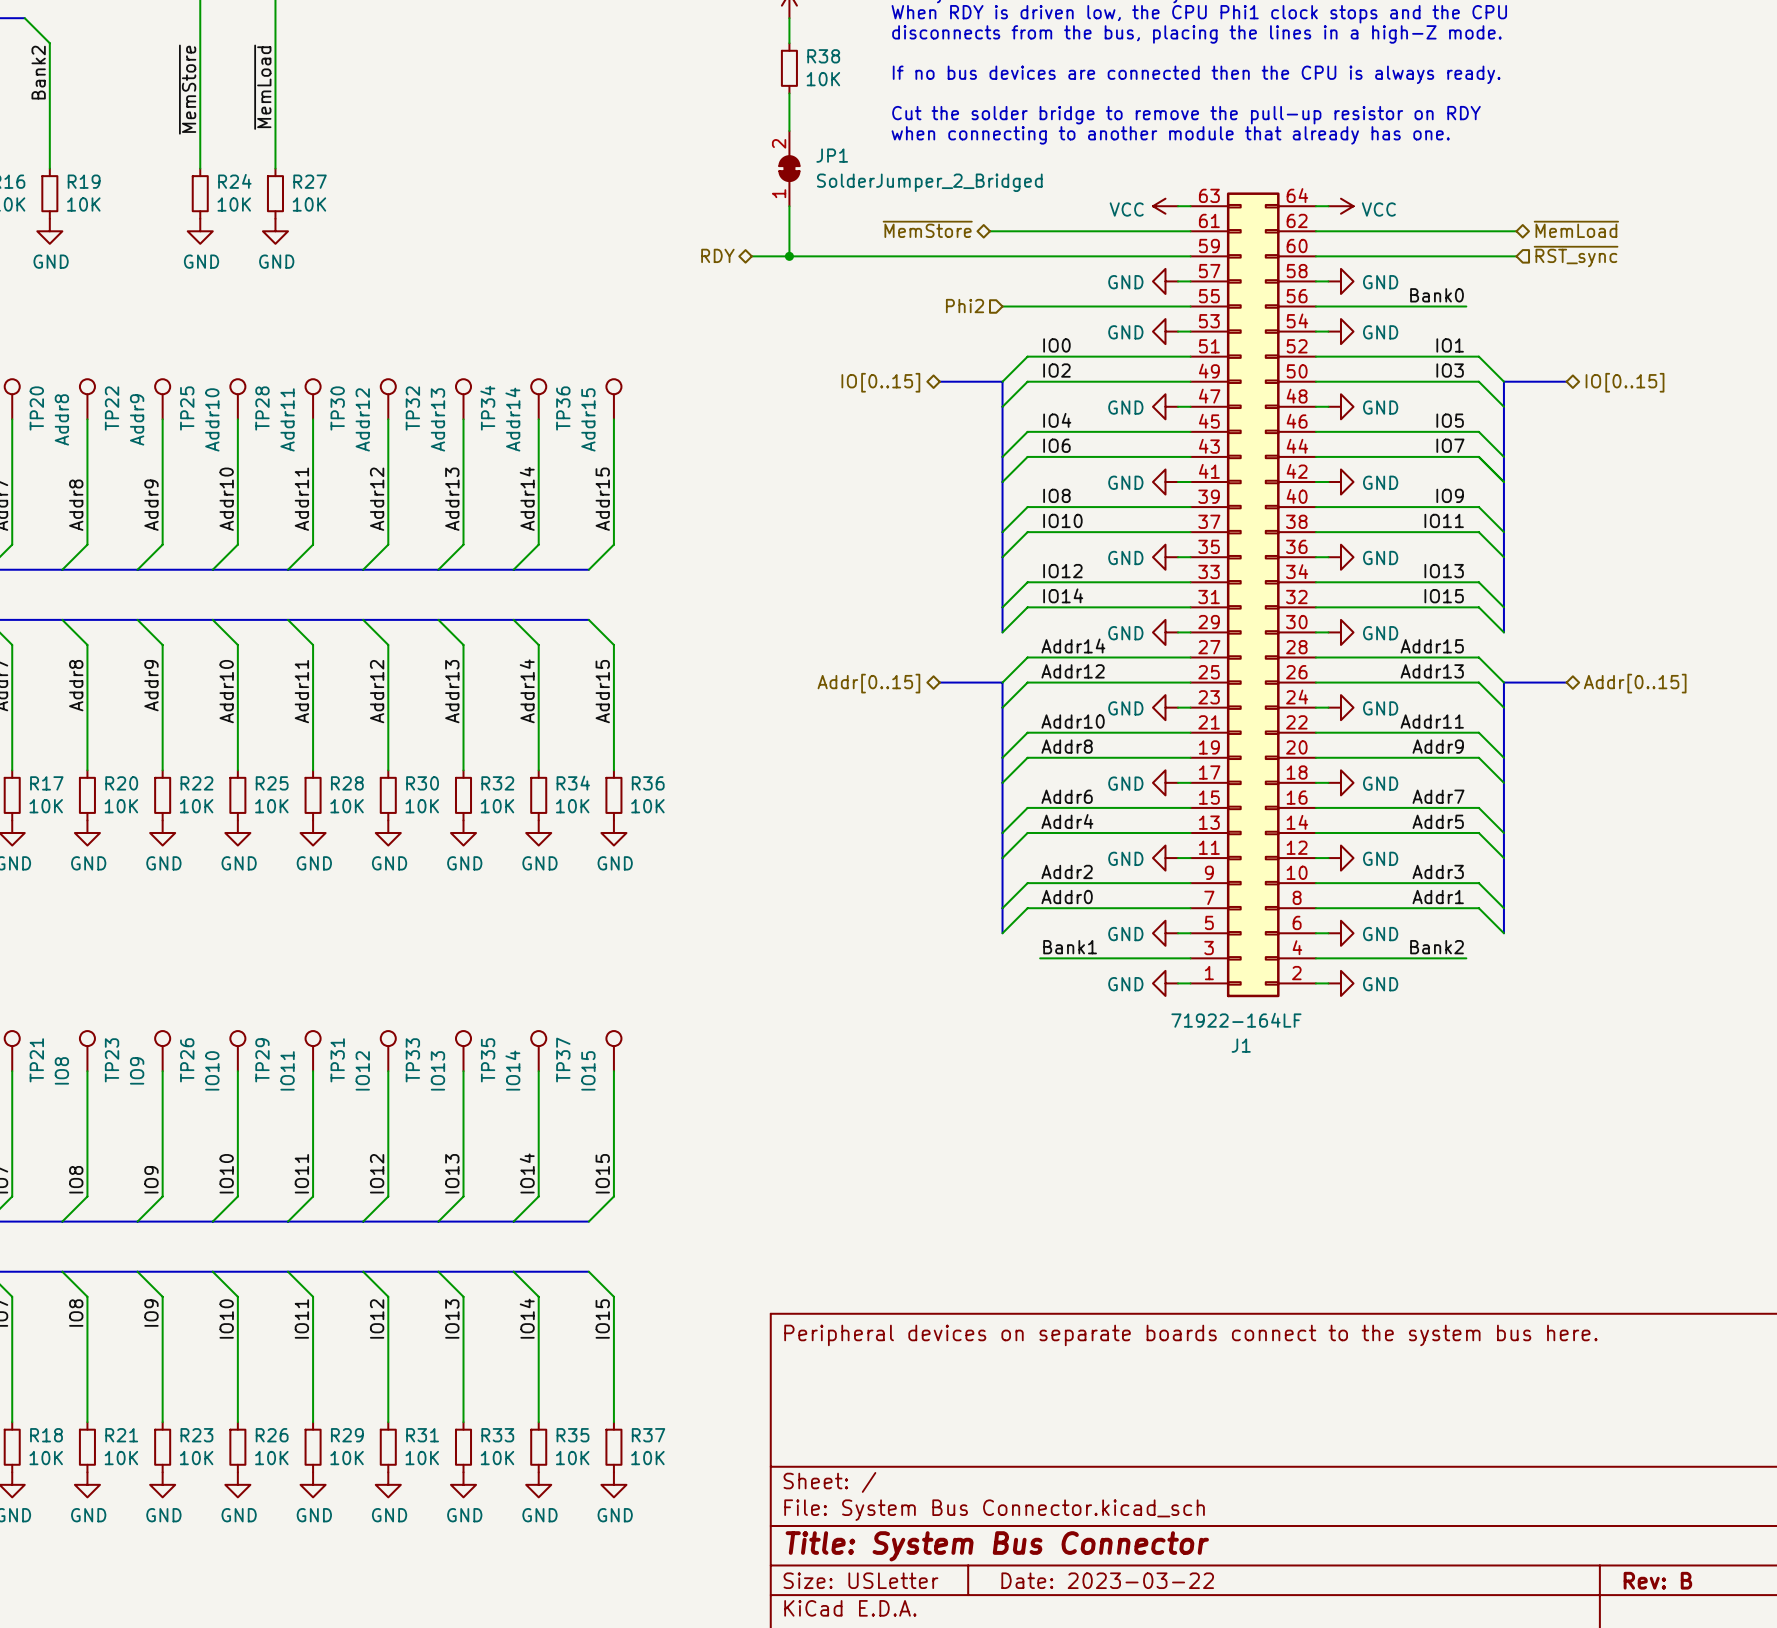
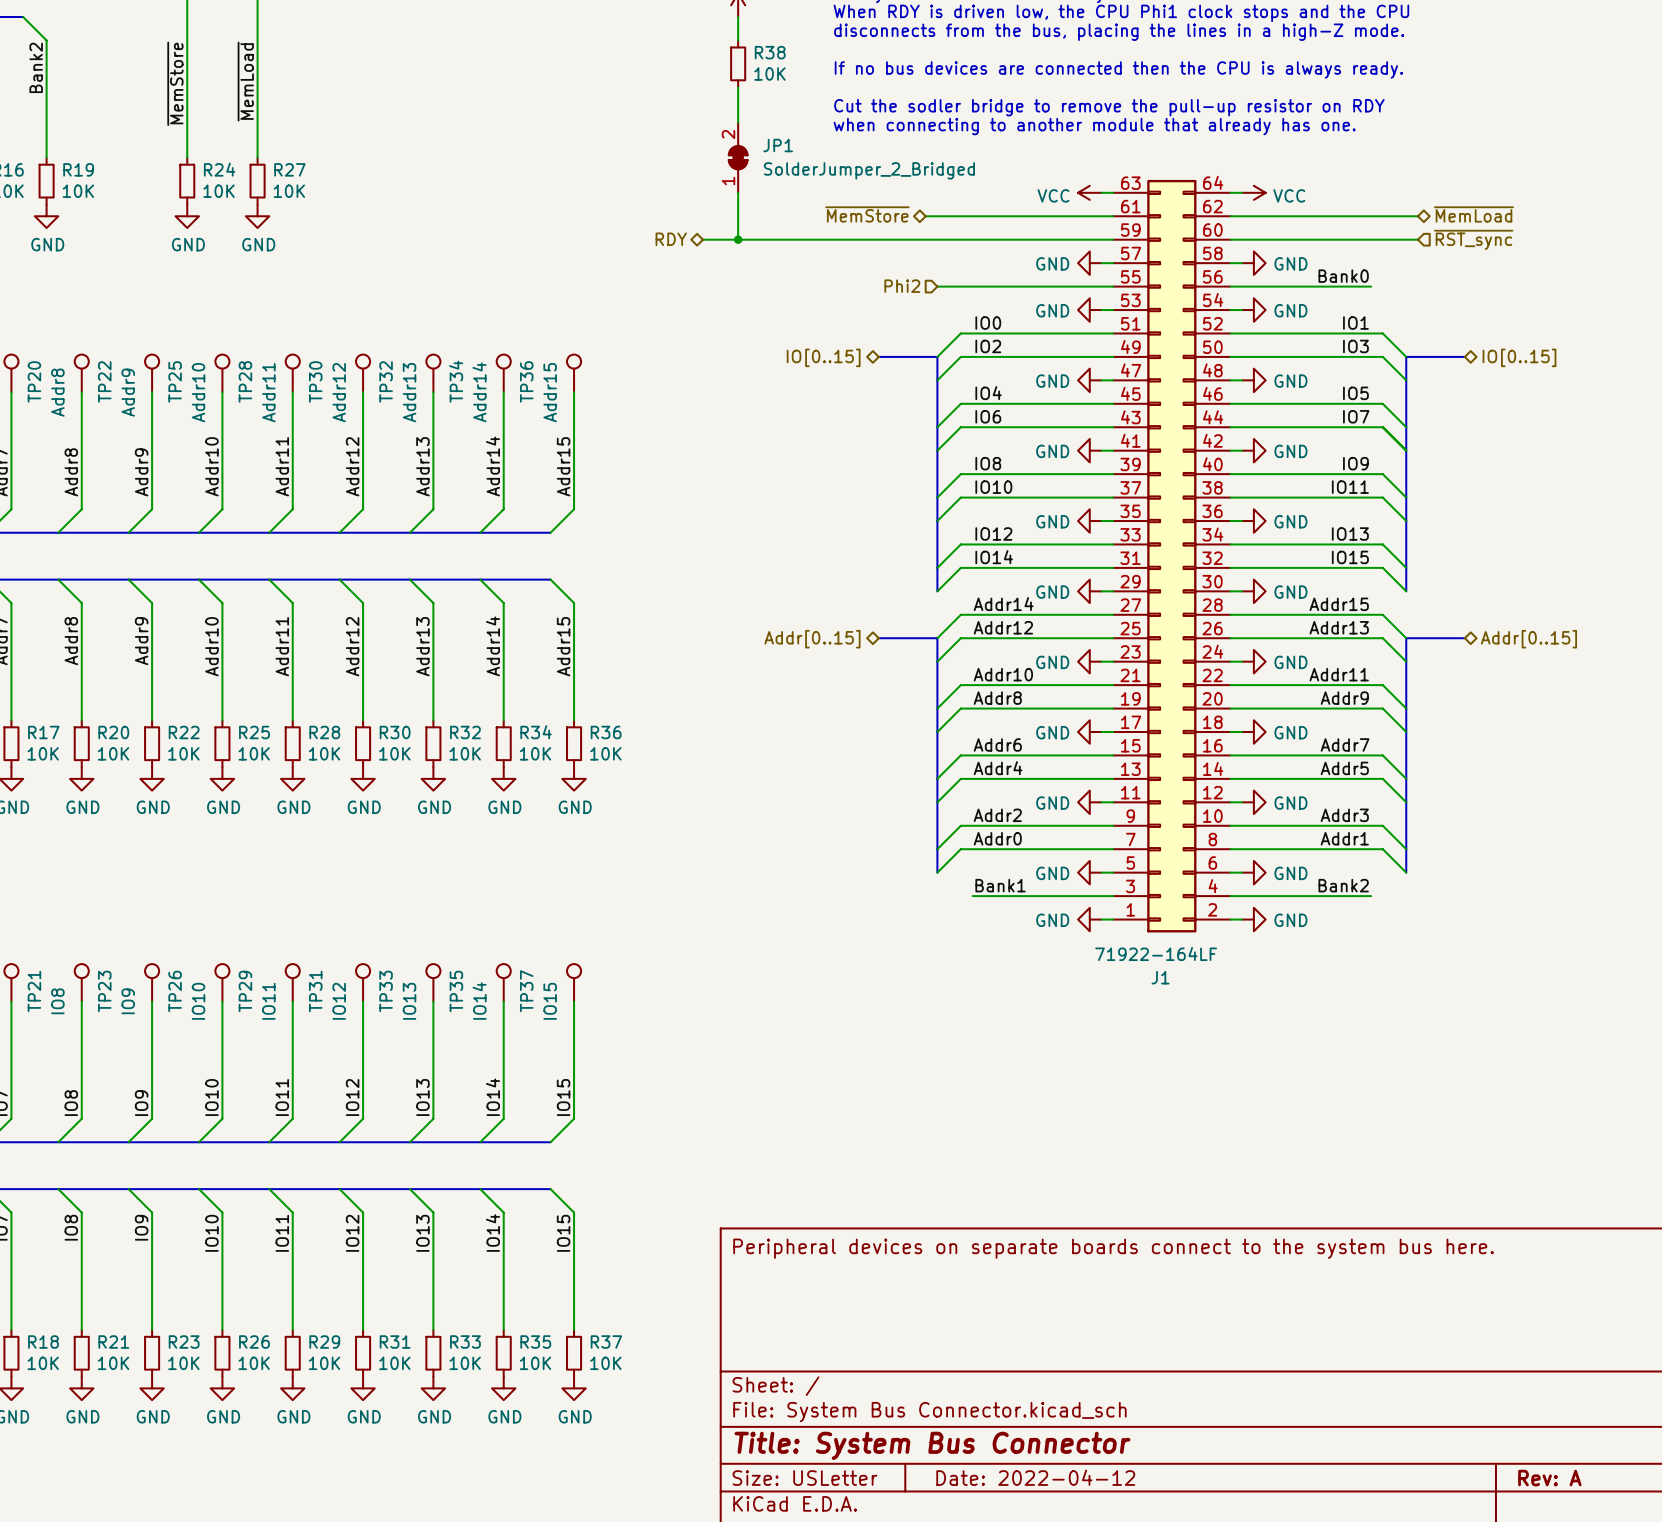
text: Cut the solder bridge to remove the pull-up resistor on RDY (1186, 115) -> Cut the sodler bridge to remove the pull-up resistor on RDY (1109, 107)
title block: Date: 2023-03-22 (1107, 1580) -> Date: 2022-04-12 (1035, 1477)
title block: Rev: B (1657, 1580) -> Rev: A (1549, 1478)

